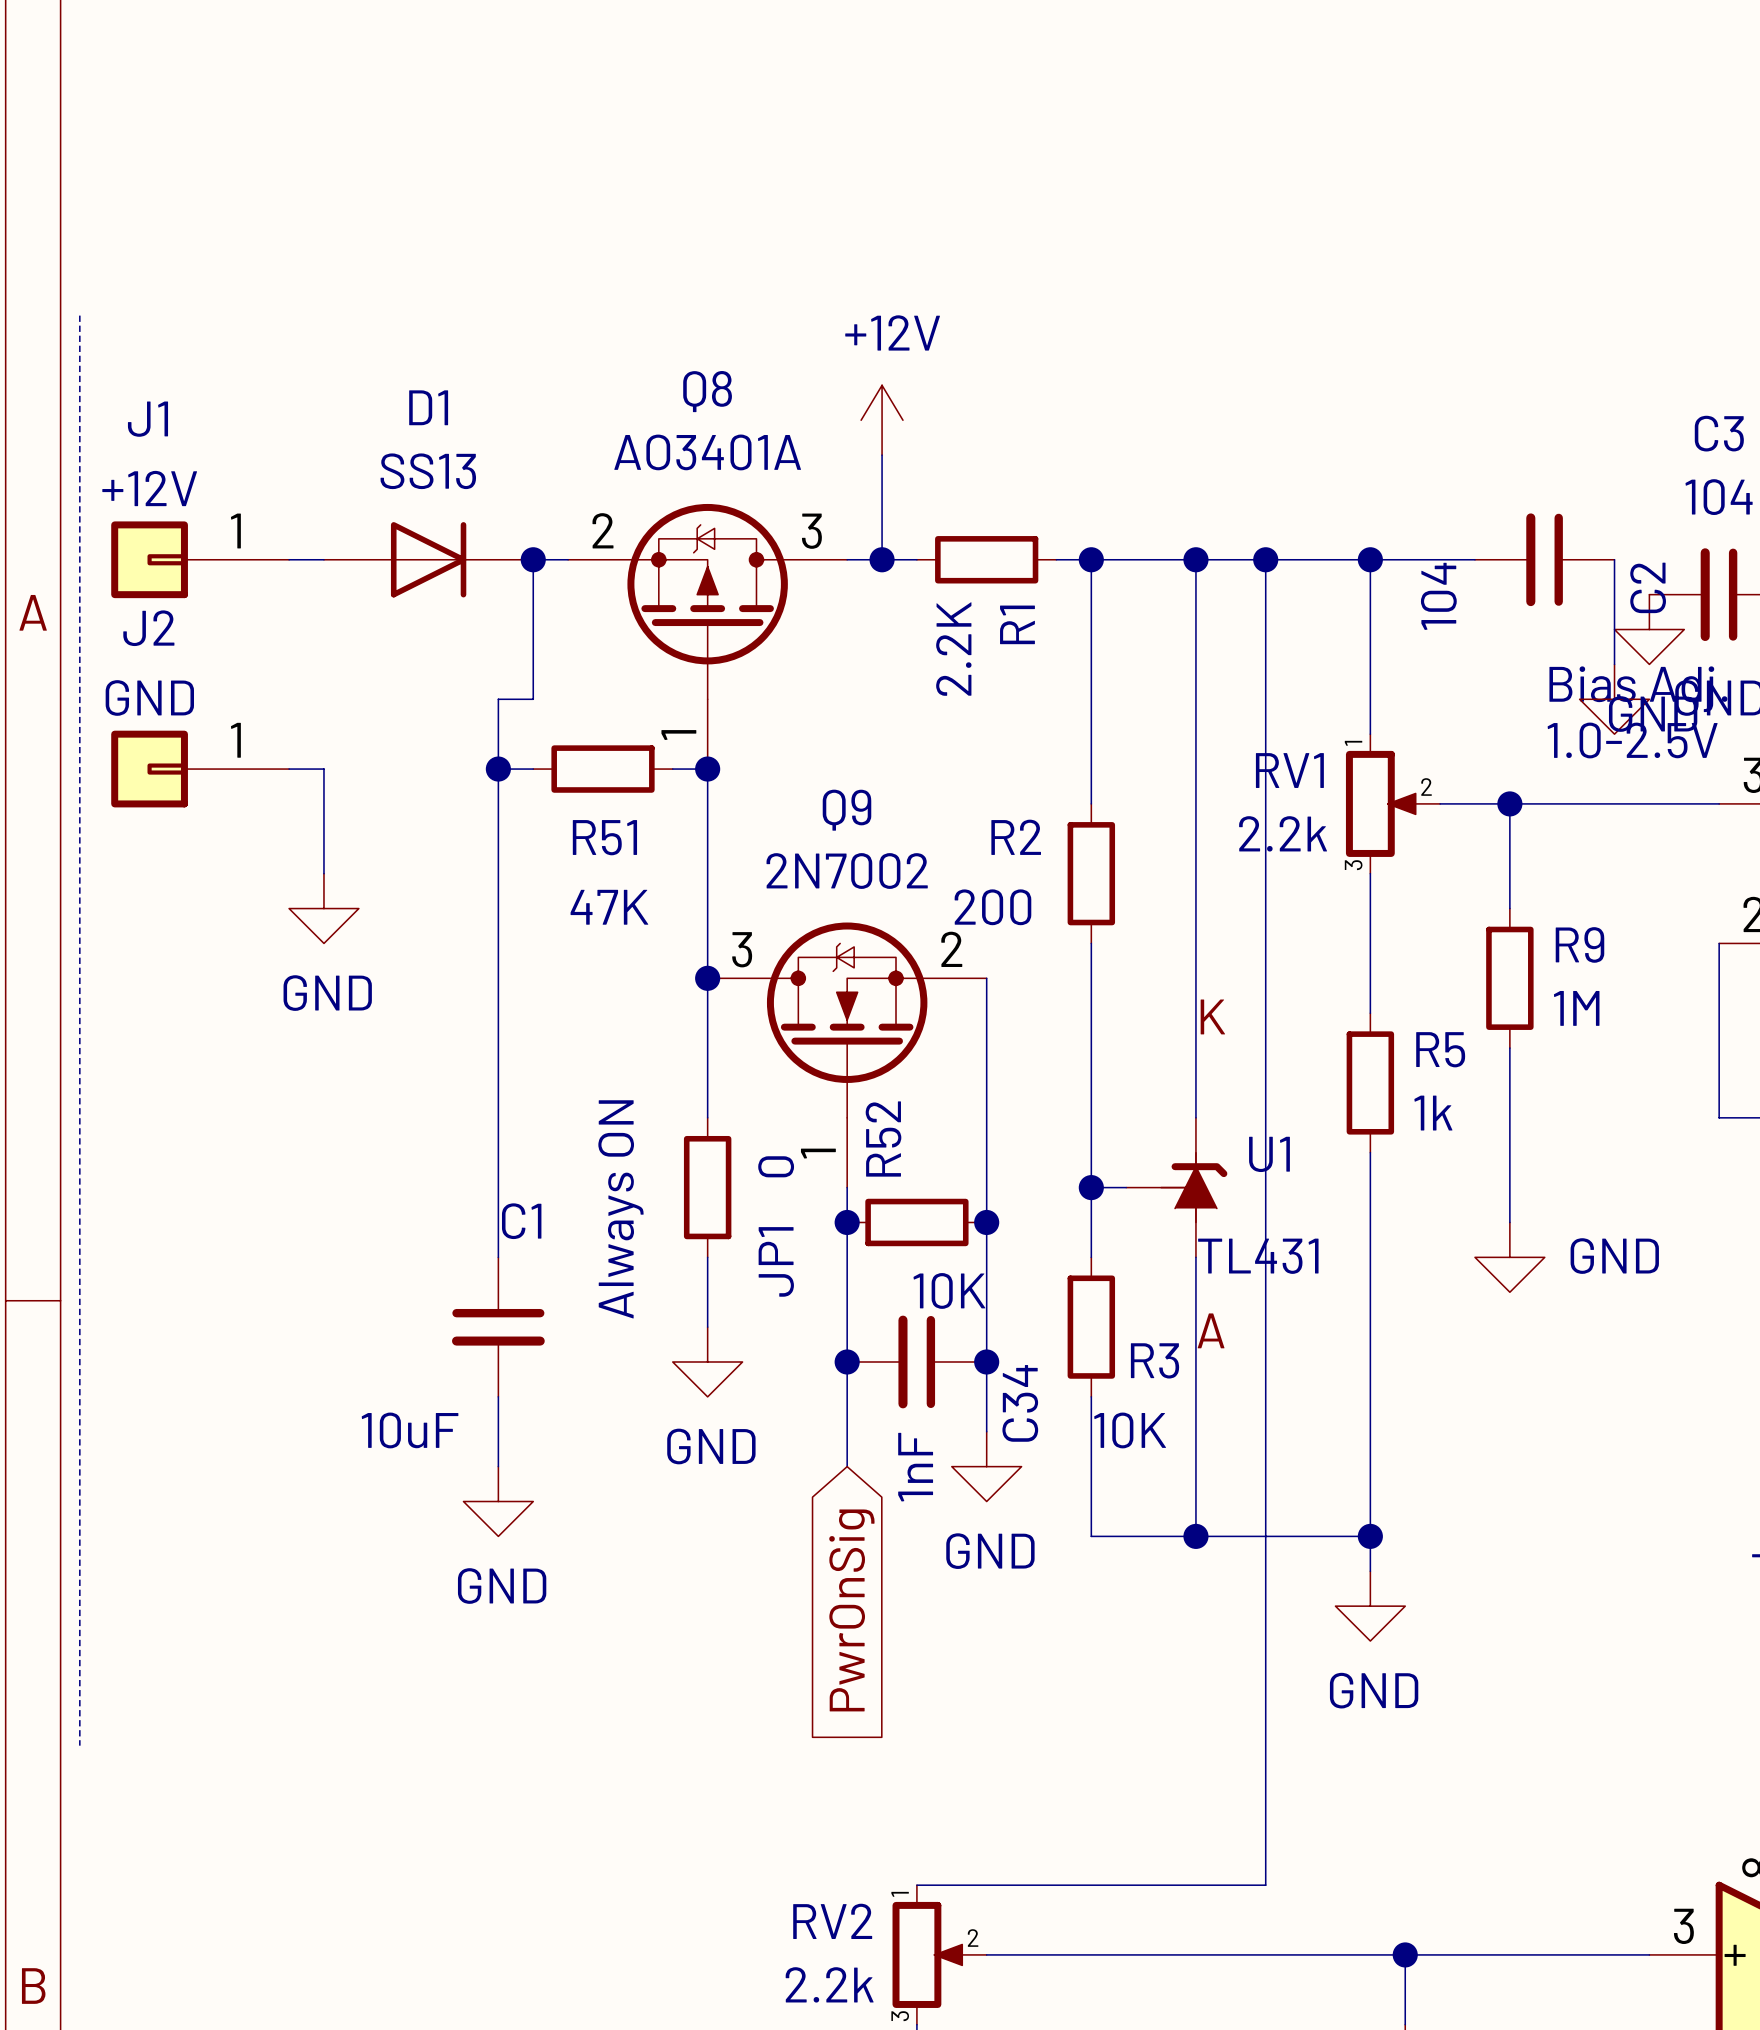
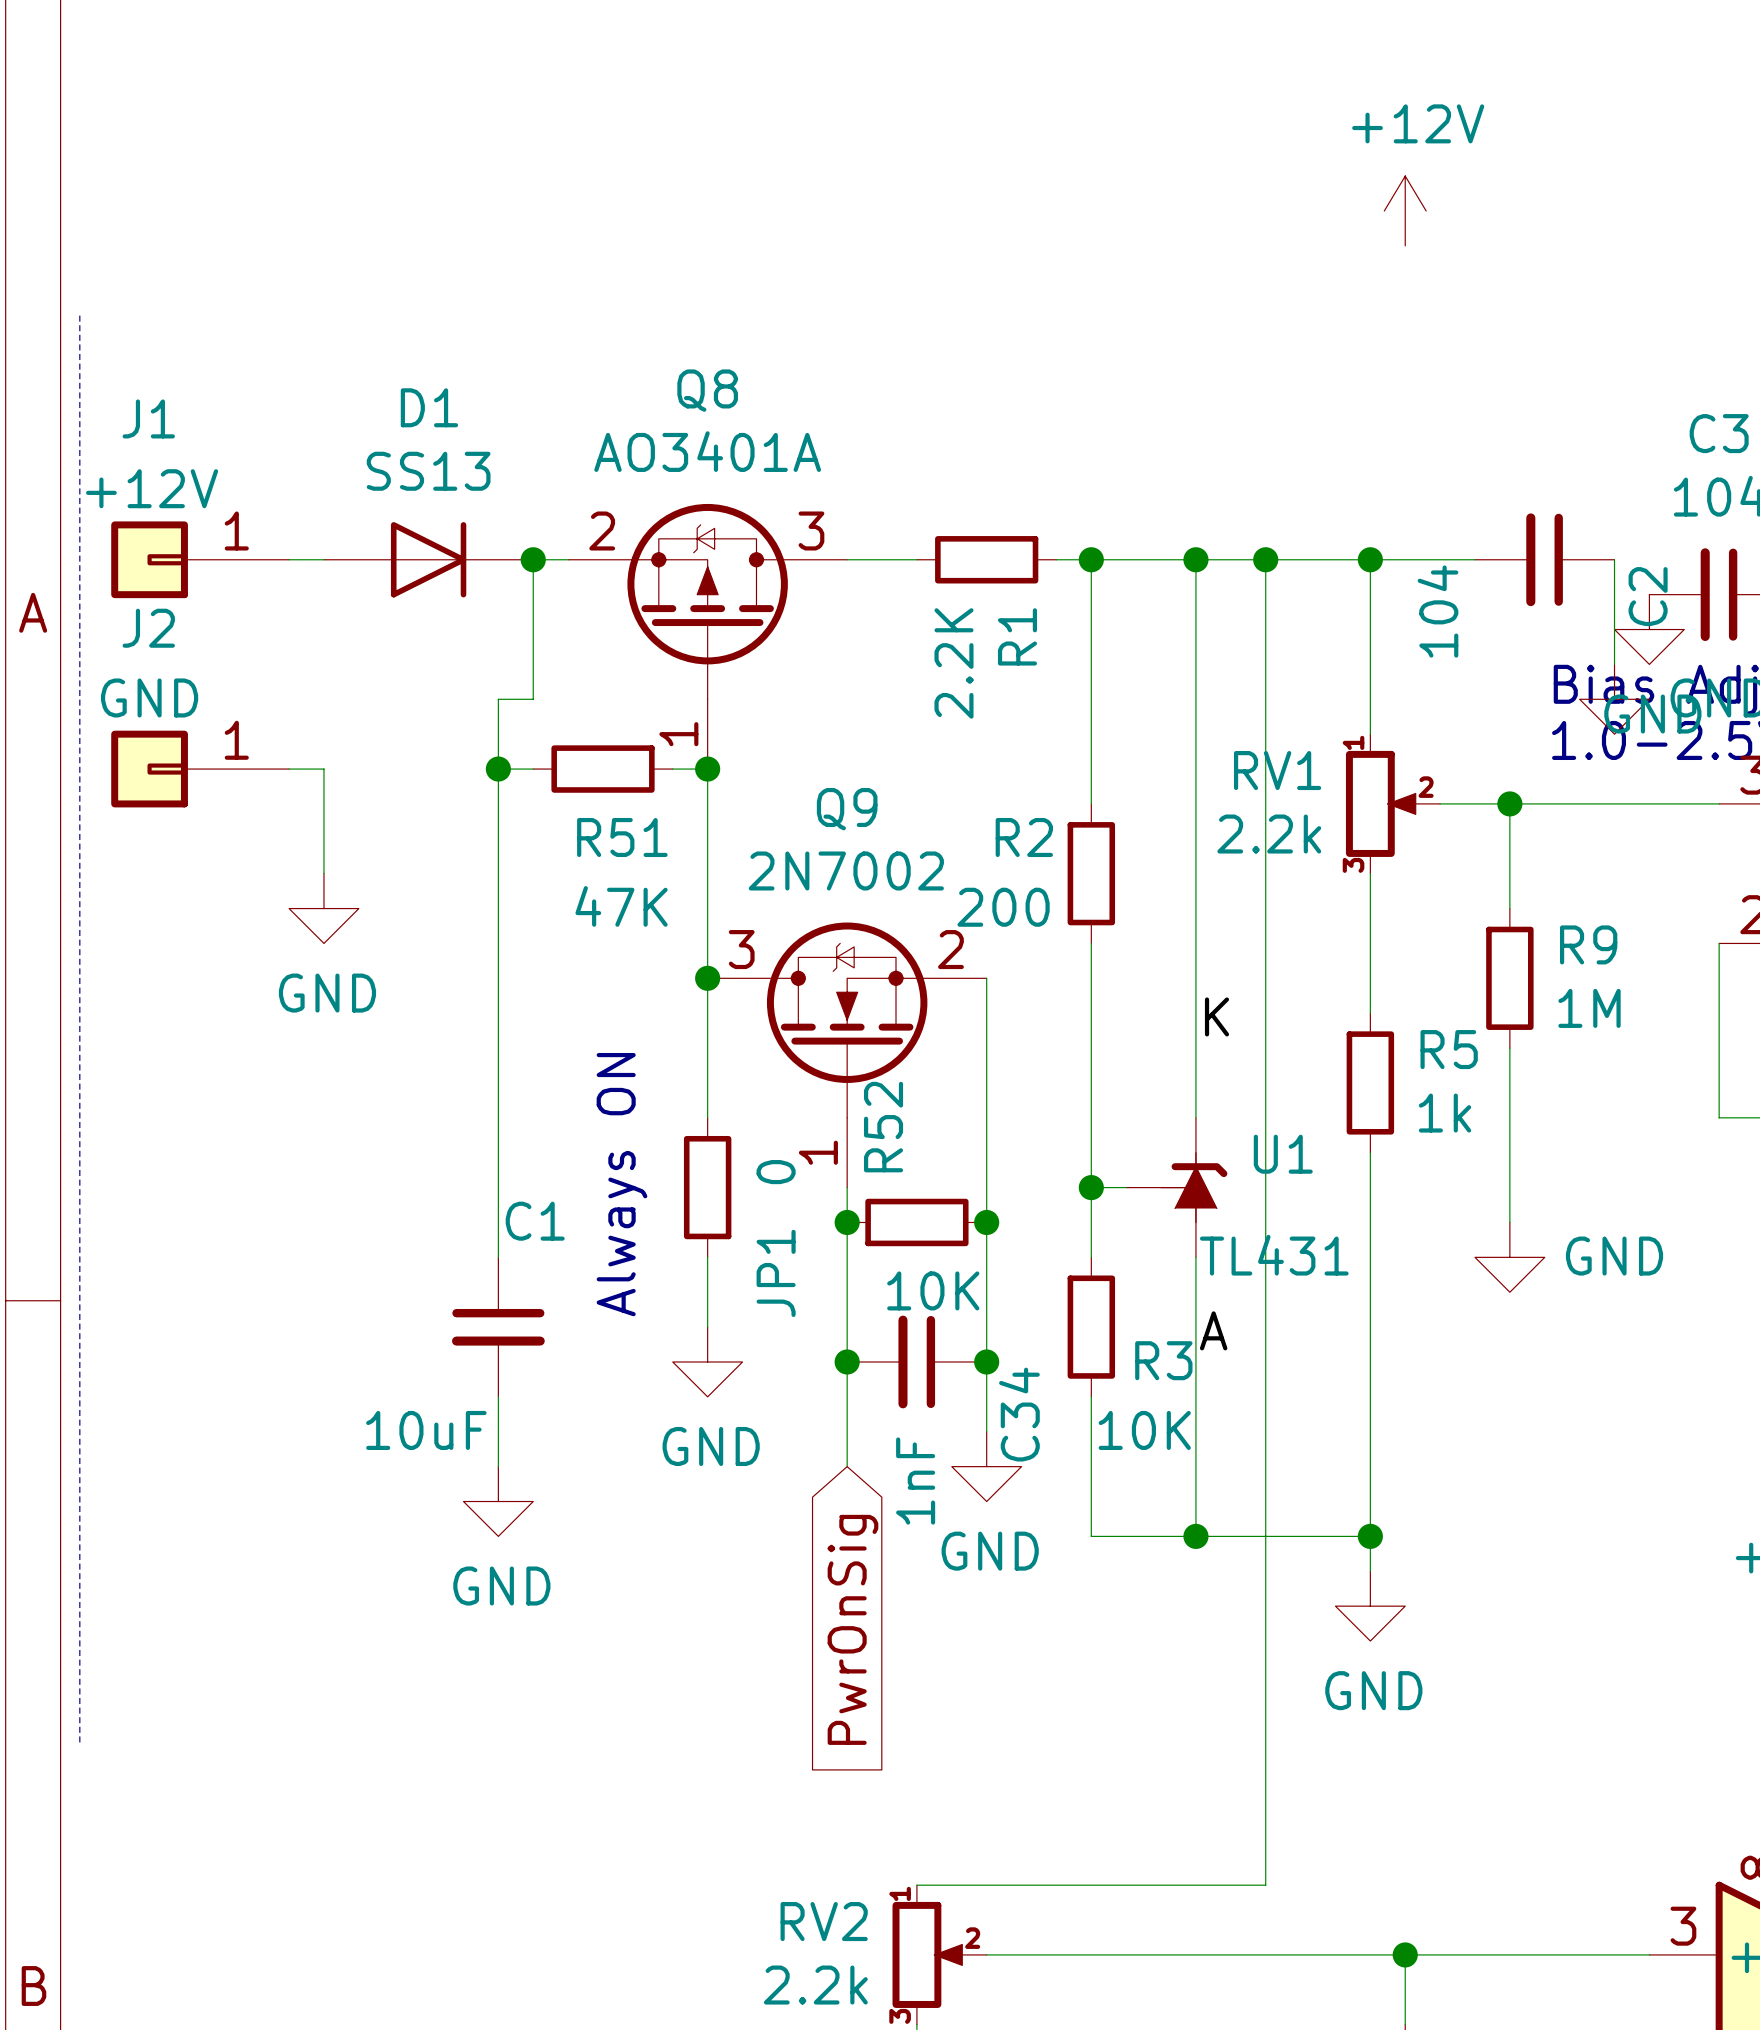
power symbol position: +12V (882, 420) -> +12V (1405, 210)
wire: (882, 455) (882, 559) -> none
junction: (882, 559) -> none

